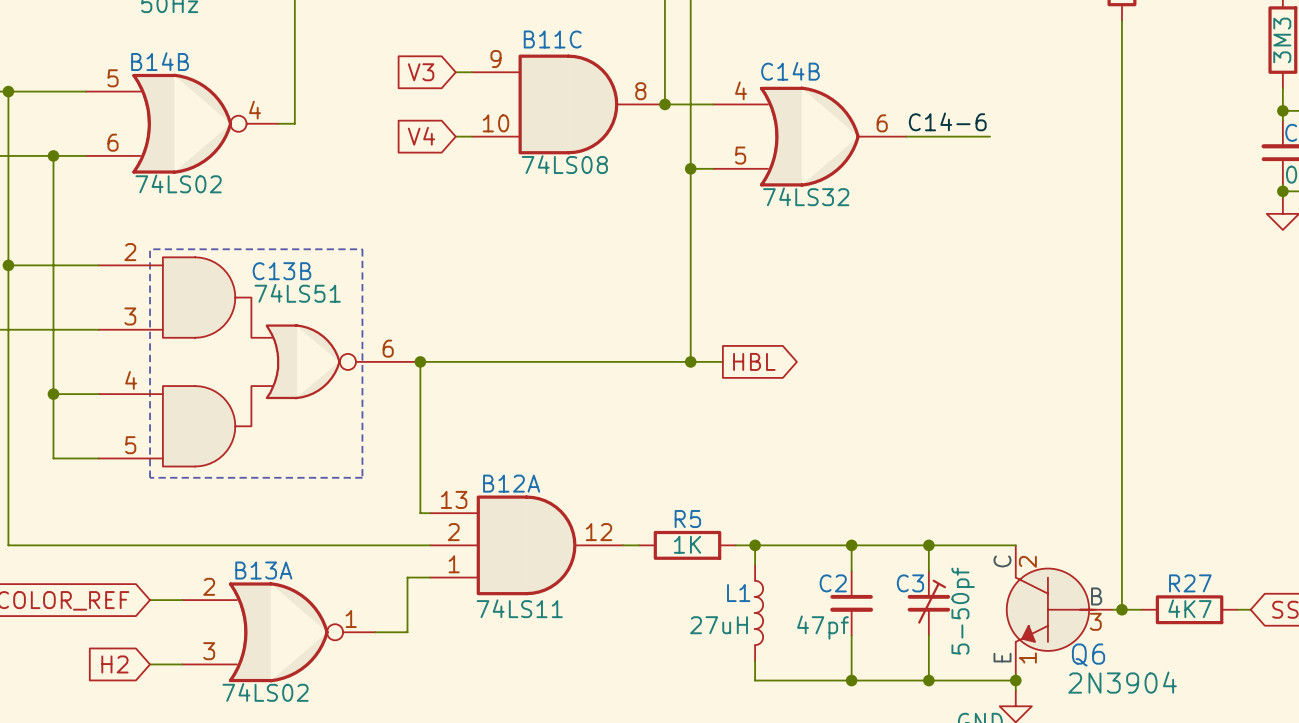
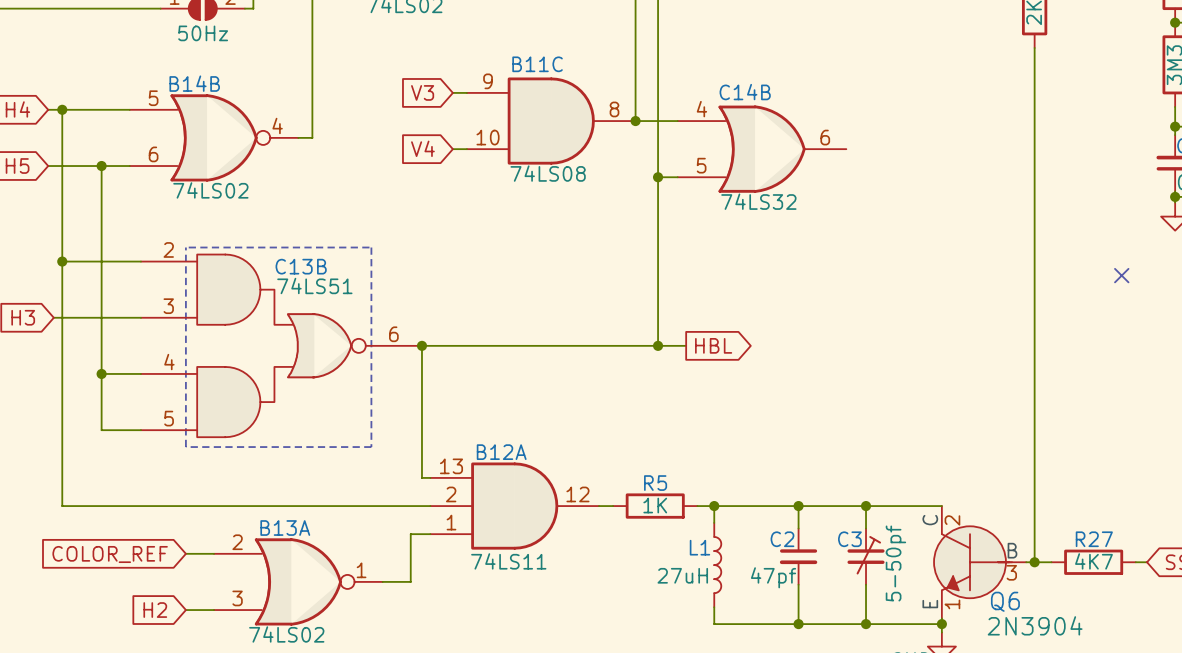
label: C14-6 (947, 121) -> none
wire: (906, 136) (990, 136) -> none
no-connect mark: none -> (1121, 275)

